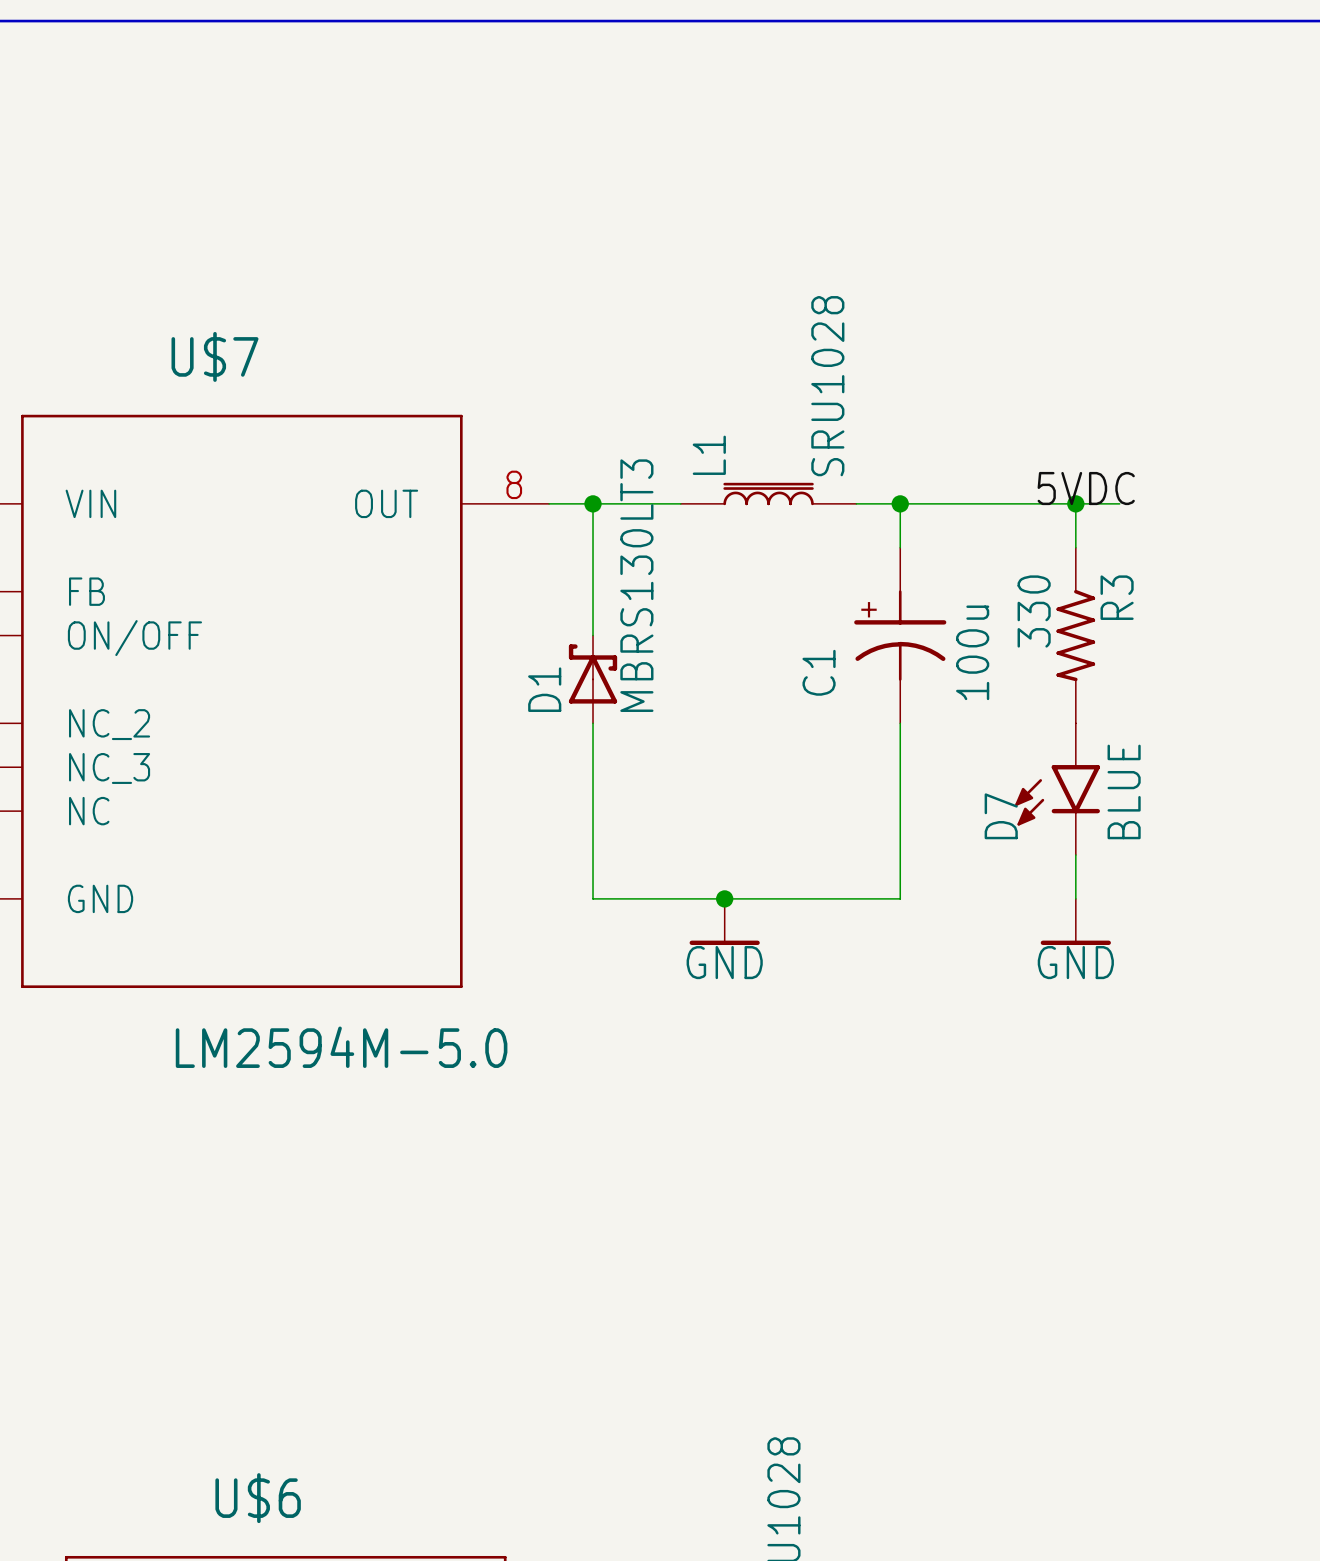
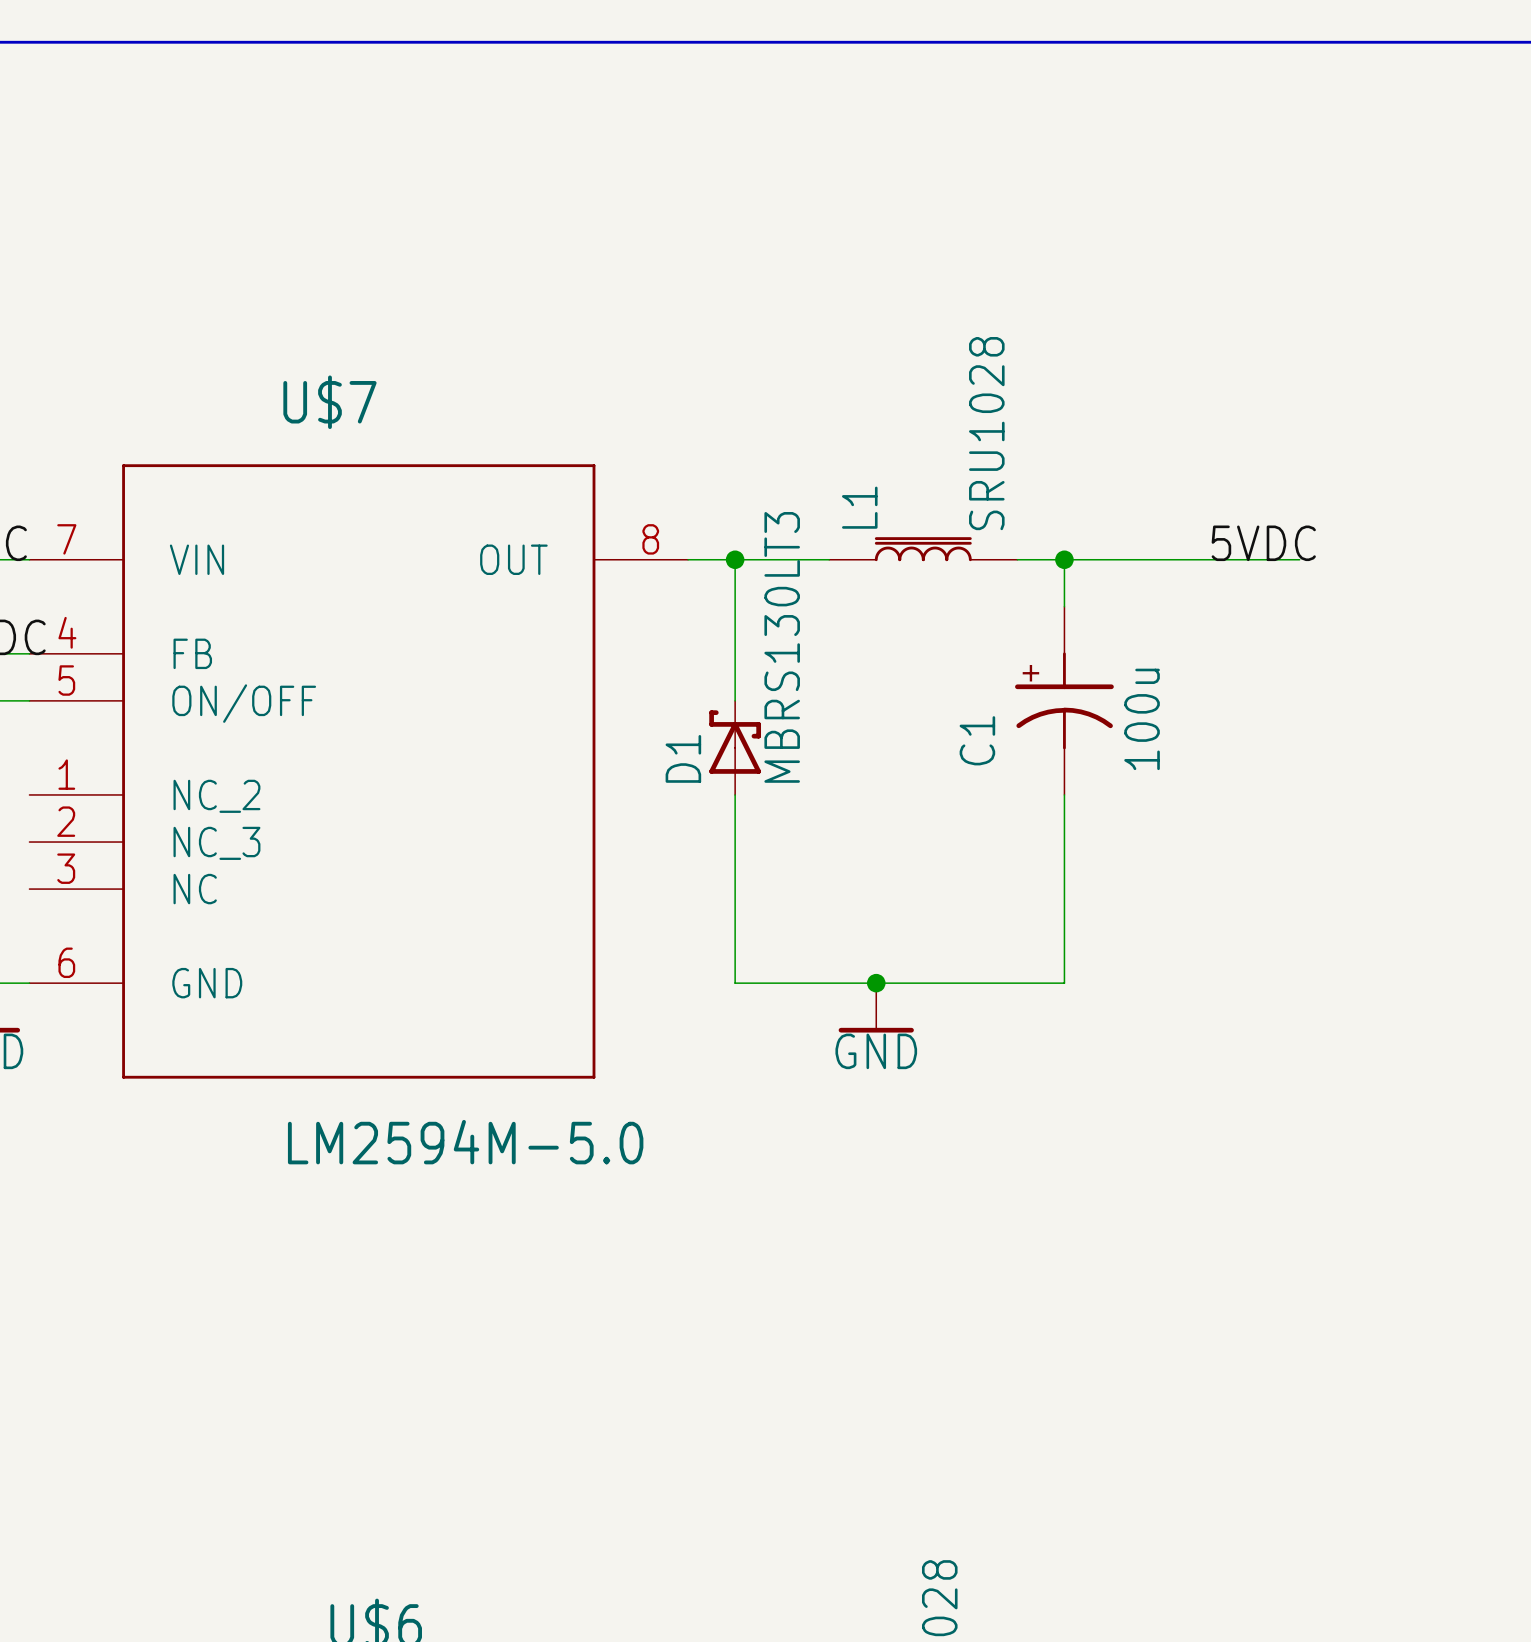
wire: (1075, 503) (1075, 547) -> none
junction: (1075, 503) -> none
R3: 330 (1075, 635) -> none
D7: BLUE (1057, 789) -> none
wire: (1075, 855) (1075, 898) -> none
power symbol: GND (1075, 921) -> none

